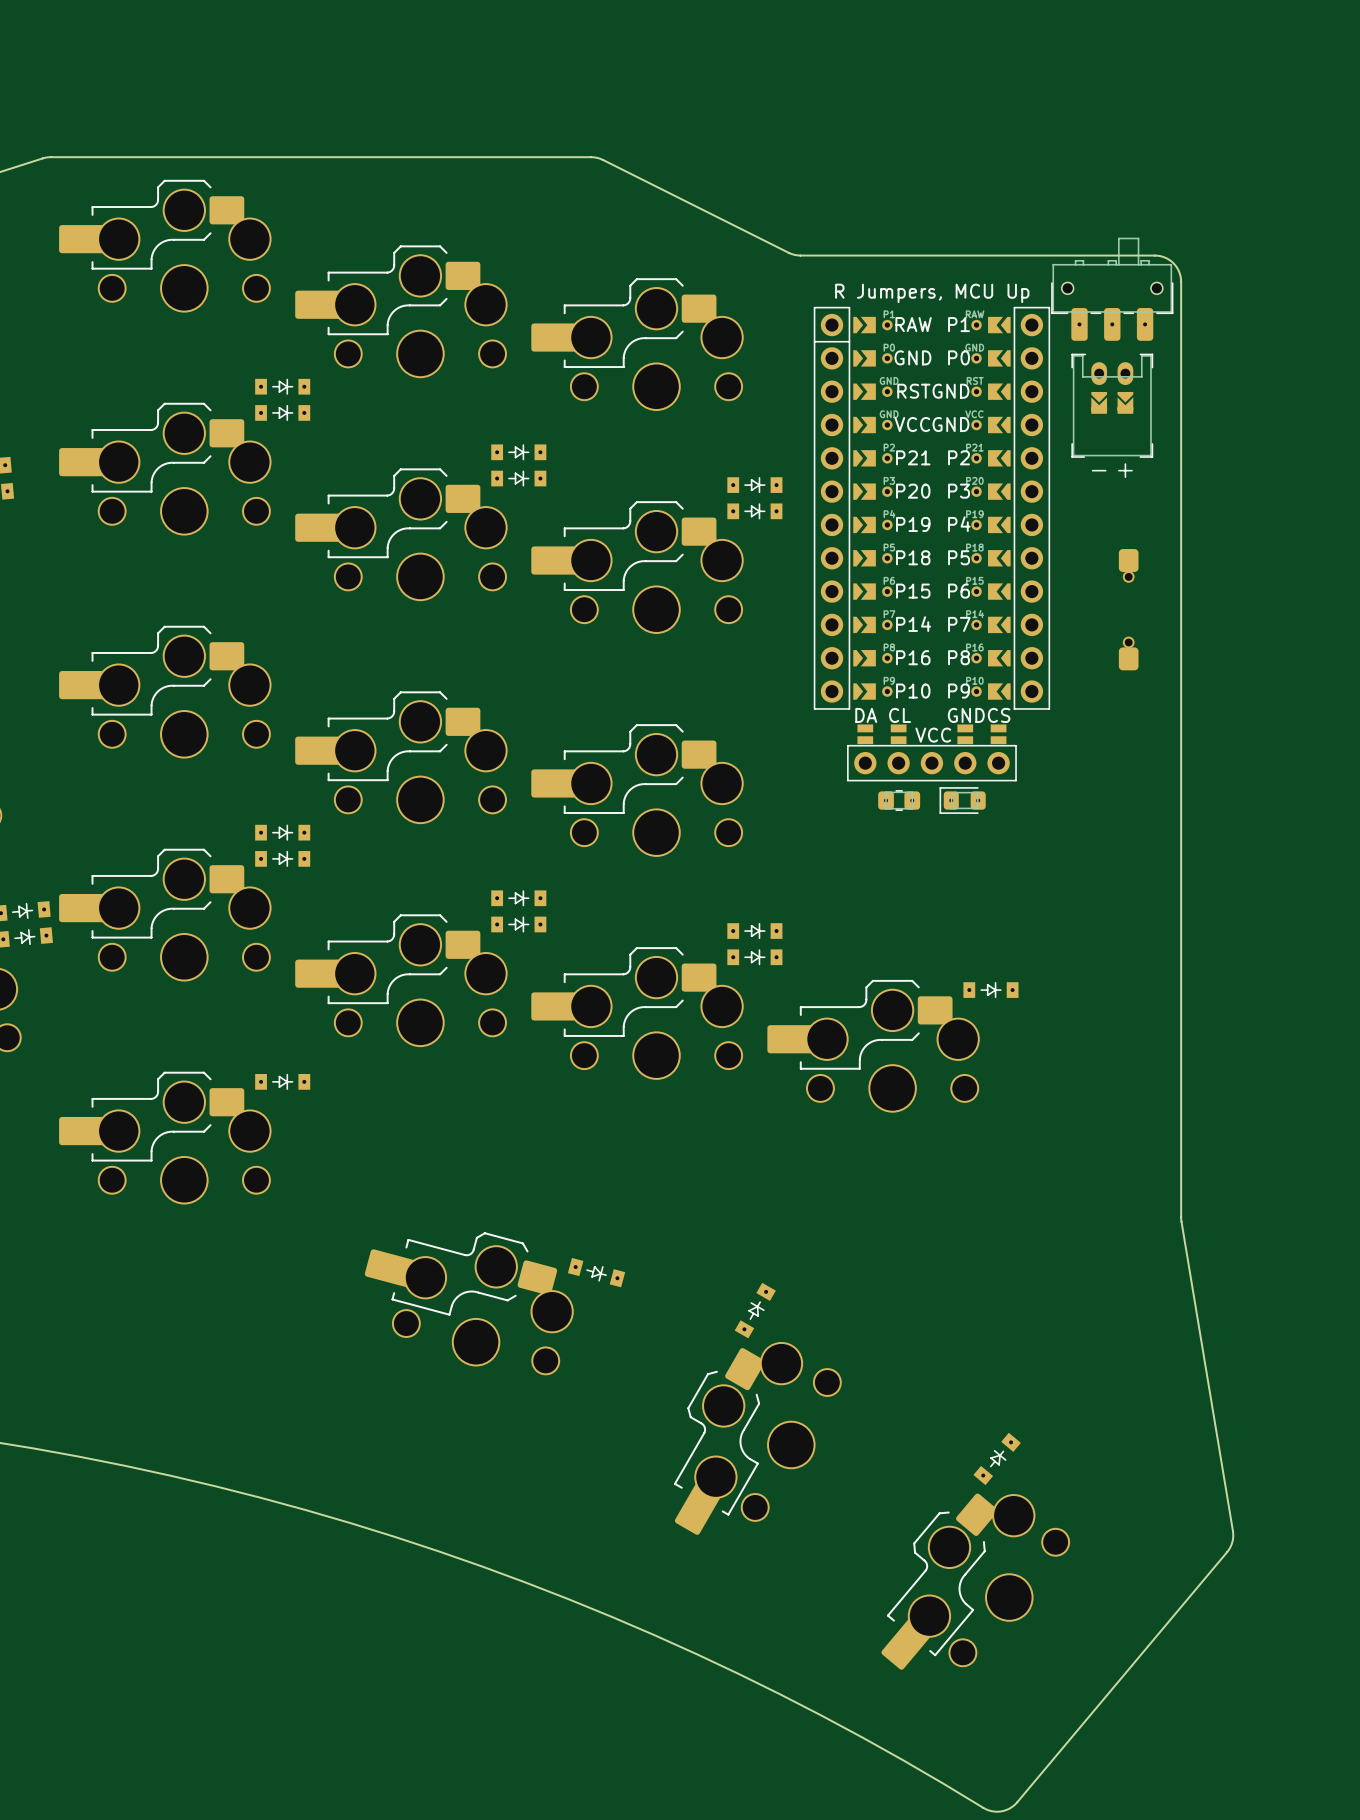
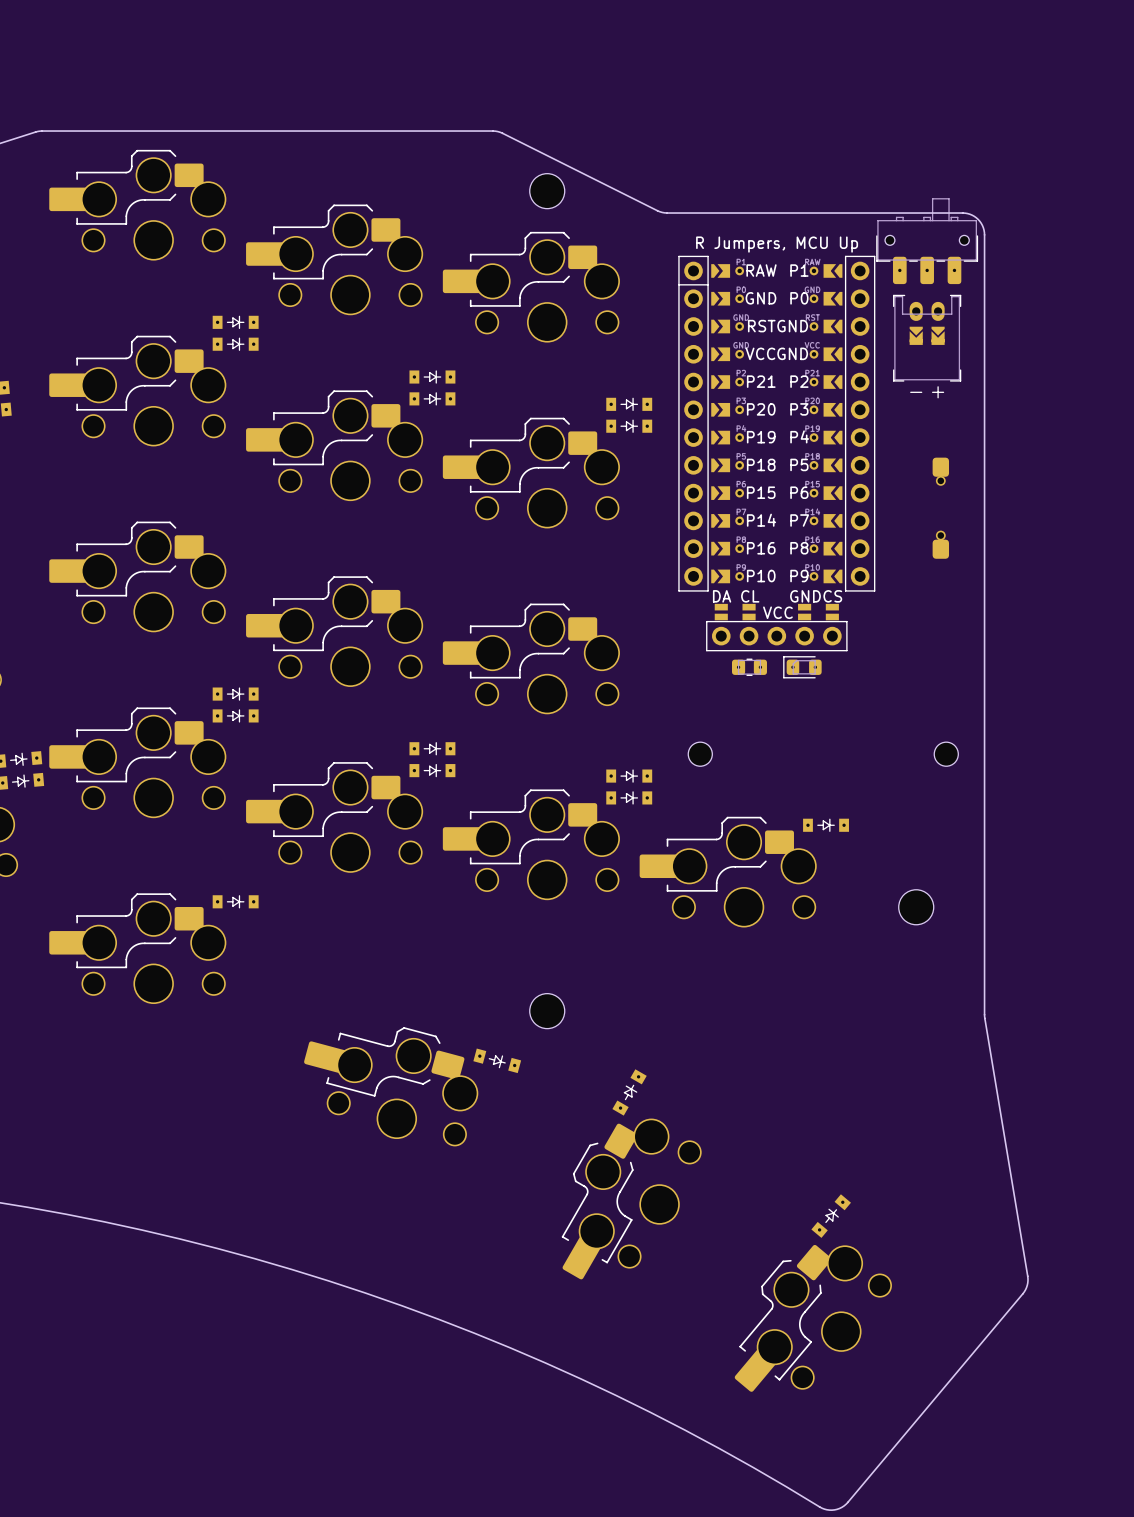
part: none -> (547, 191)
part: none -> (700, 754)
part: none -> (946, 754)
part: none -> (916, 907)
part: none -> (547, 1011)

